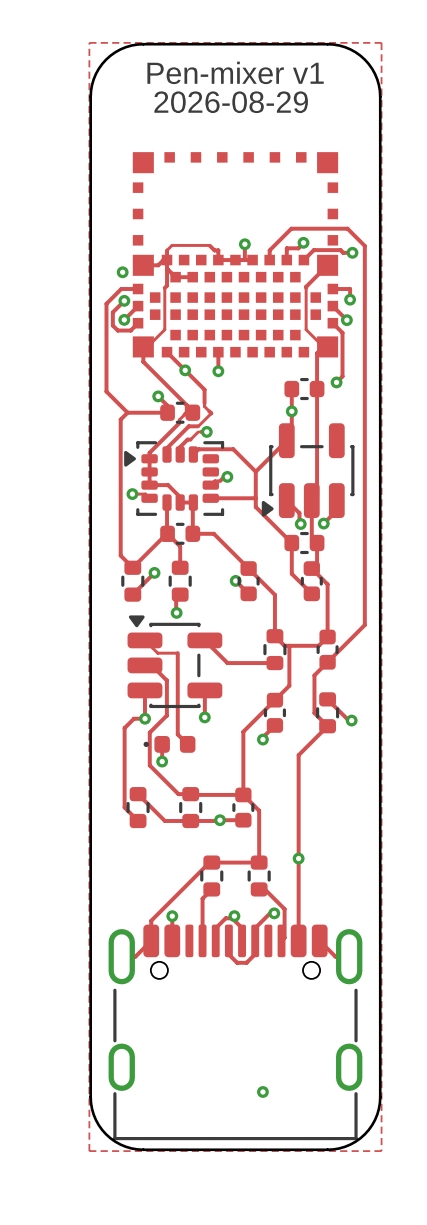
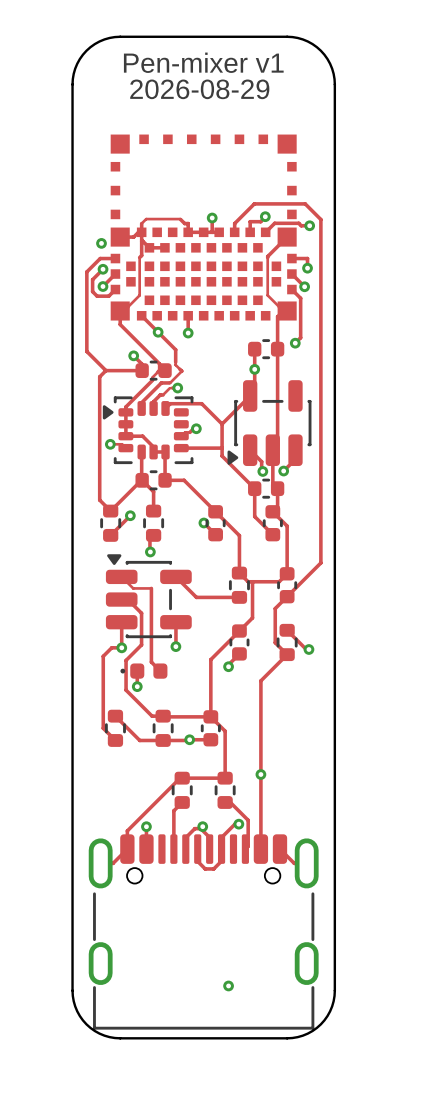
zone outline: (89, 42) (381, 42) (381, 1151) (89, 1151) (89, 42) -> none

